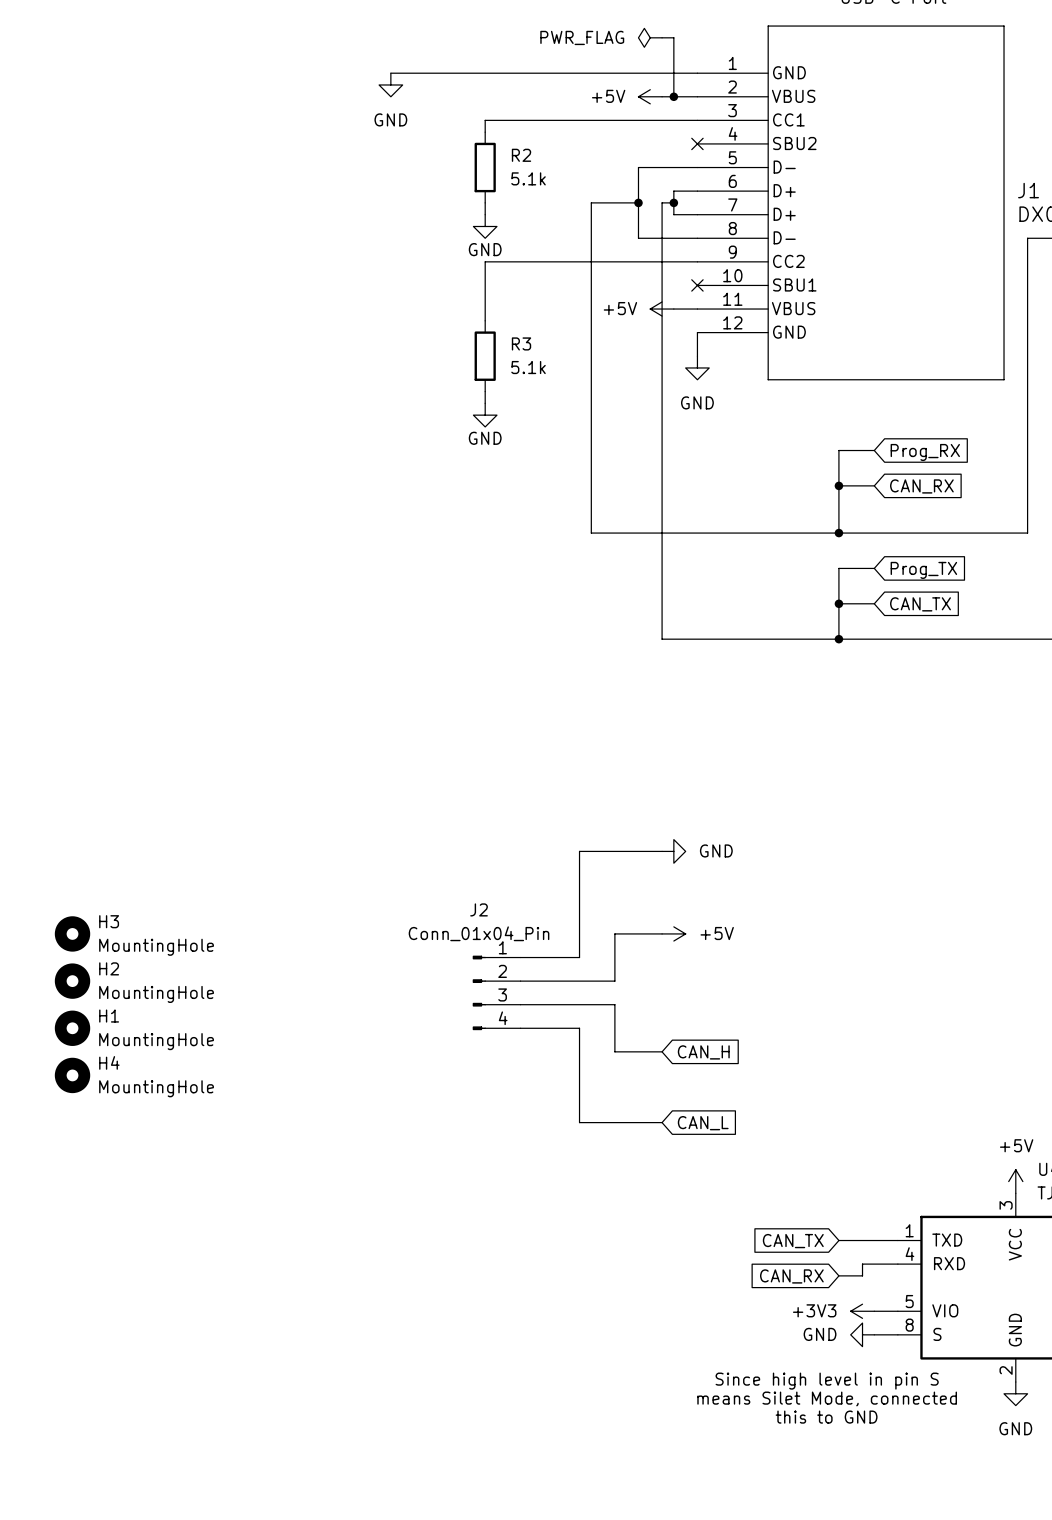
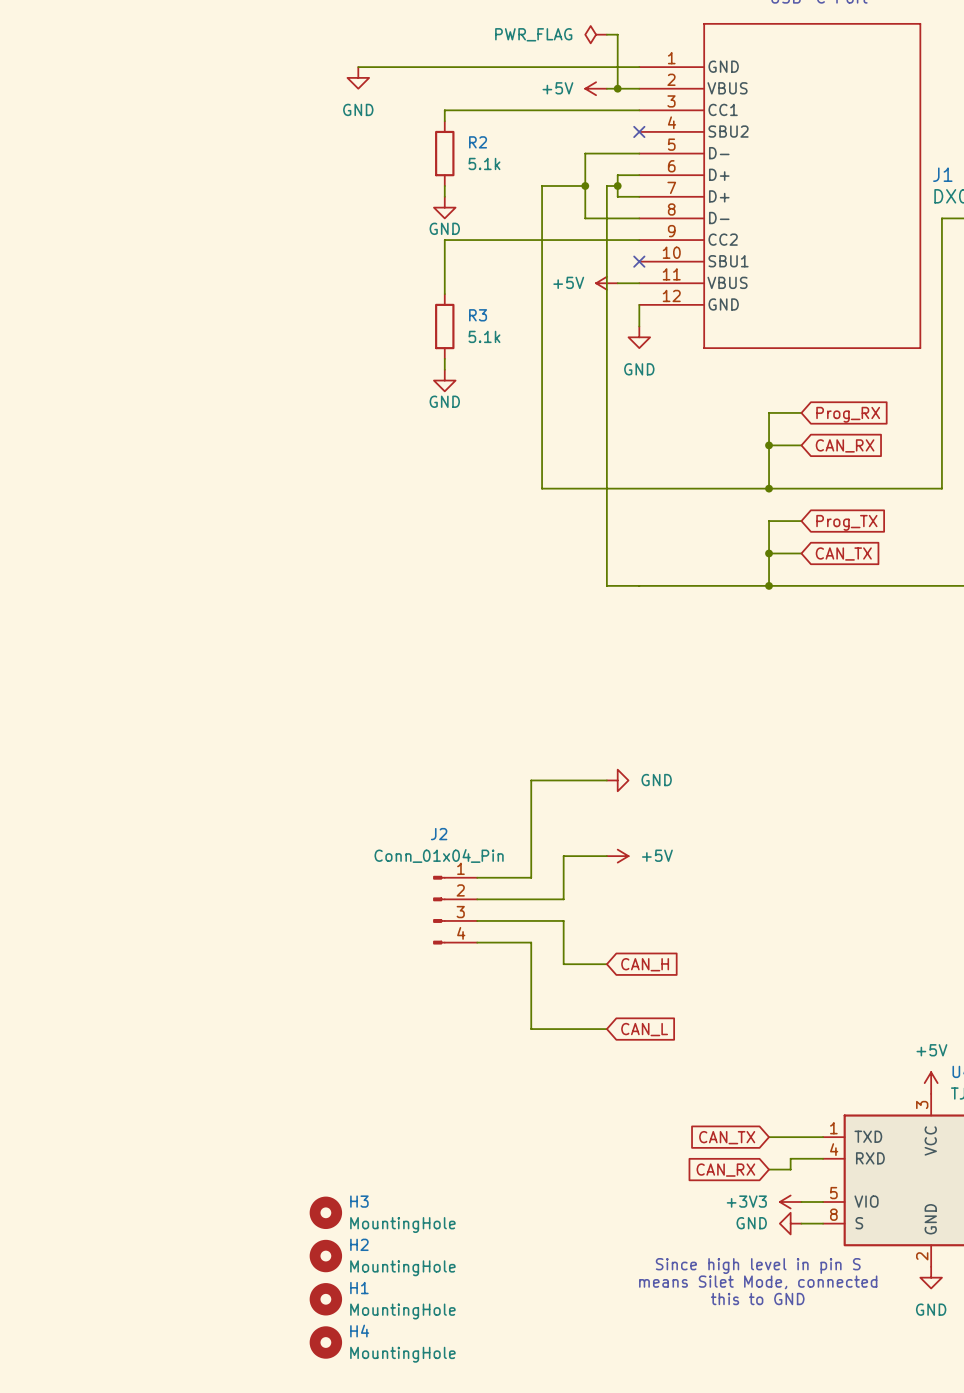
H3 position: (72, 933) -> (325, 1212)
H2 position: (72, 981) -> (325, 1256)
H1 position: (72, 1028) -> (325, 1299)
H4 position: (72, 1075) -> (325, 1342)

